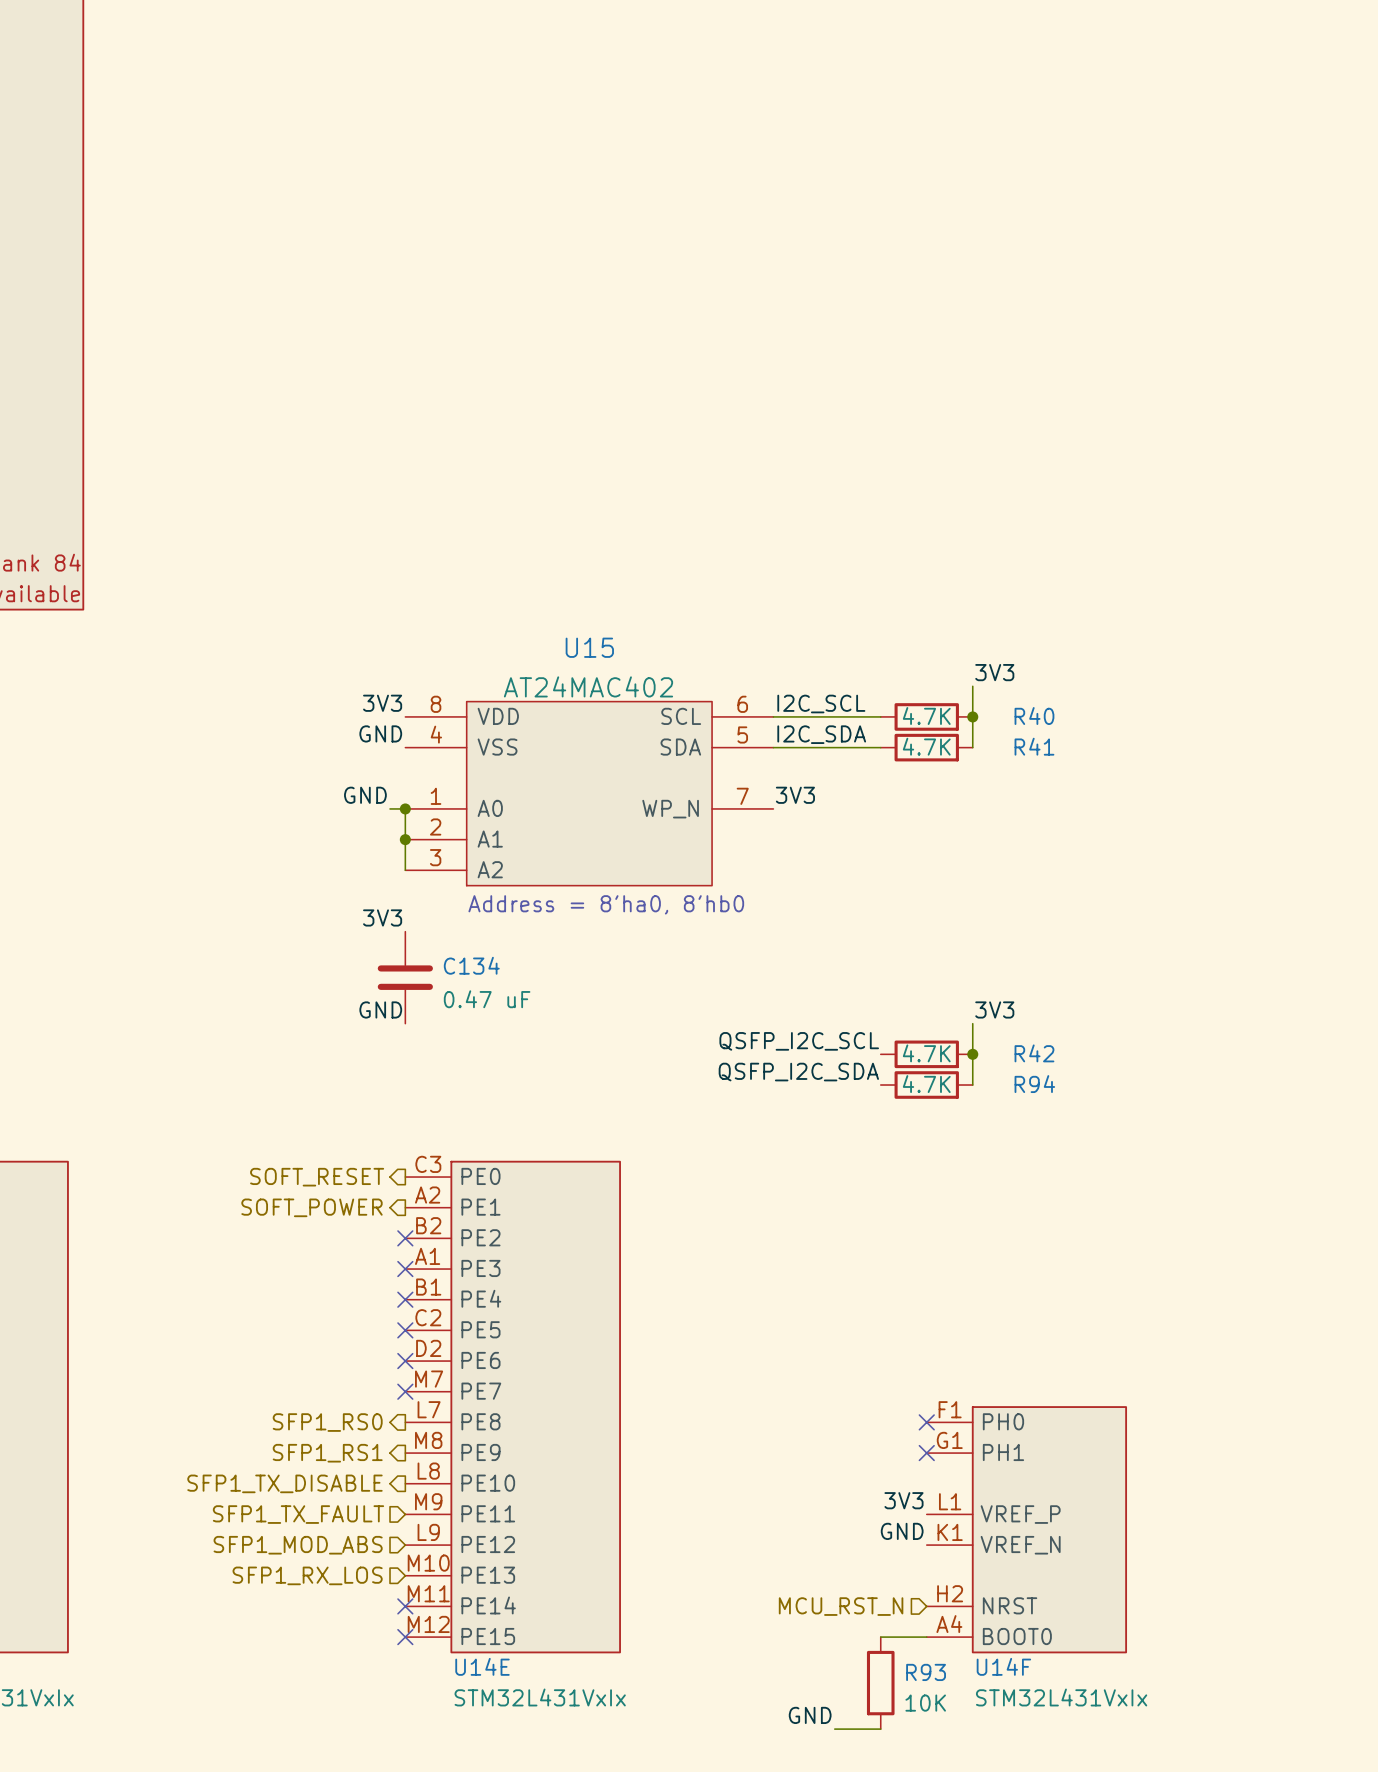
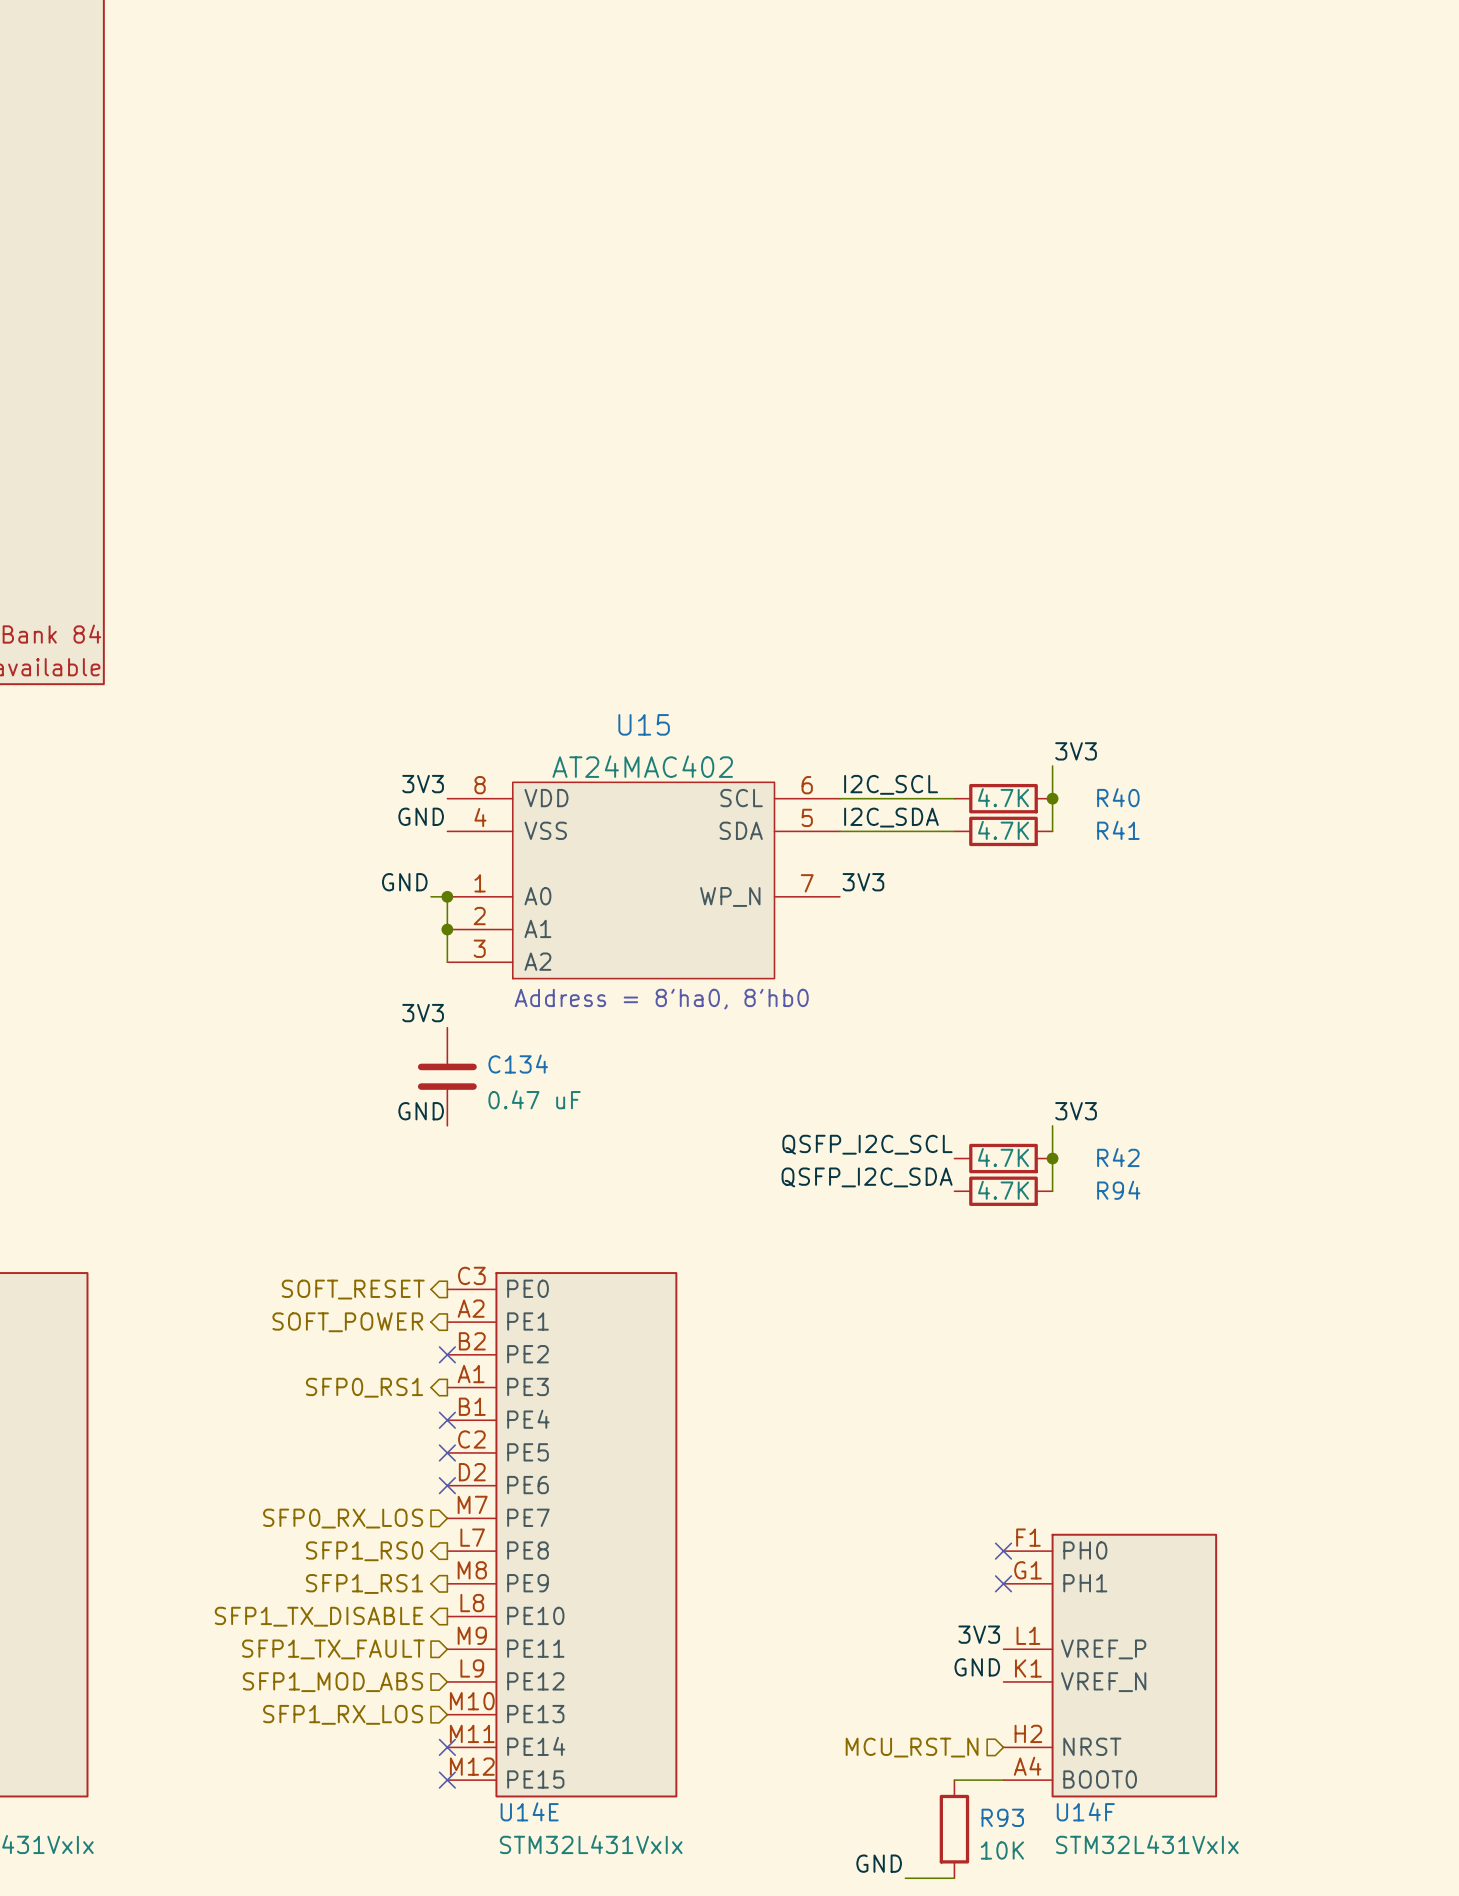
hierarchical label: none -> SFP0_RS1 (364, 1387)
no-connect mark: (405, 1269) -> none
hierarchical label: none -> SFP0_RX_LOS (343, 1518)
no-connect mark: (405, 1391) -> none

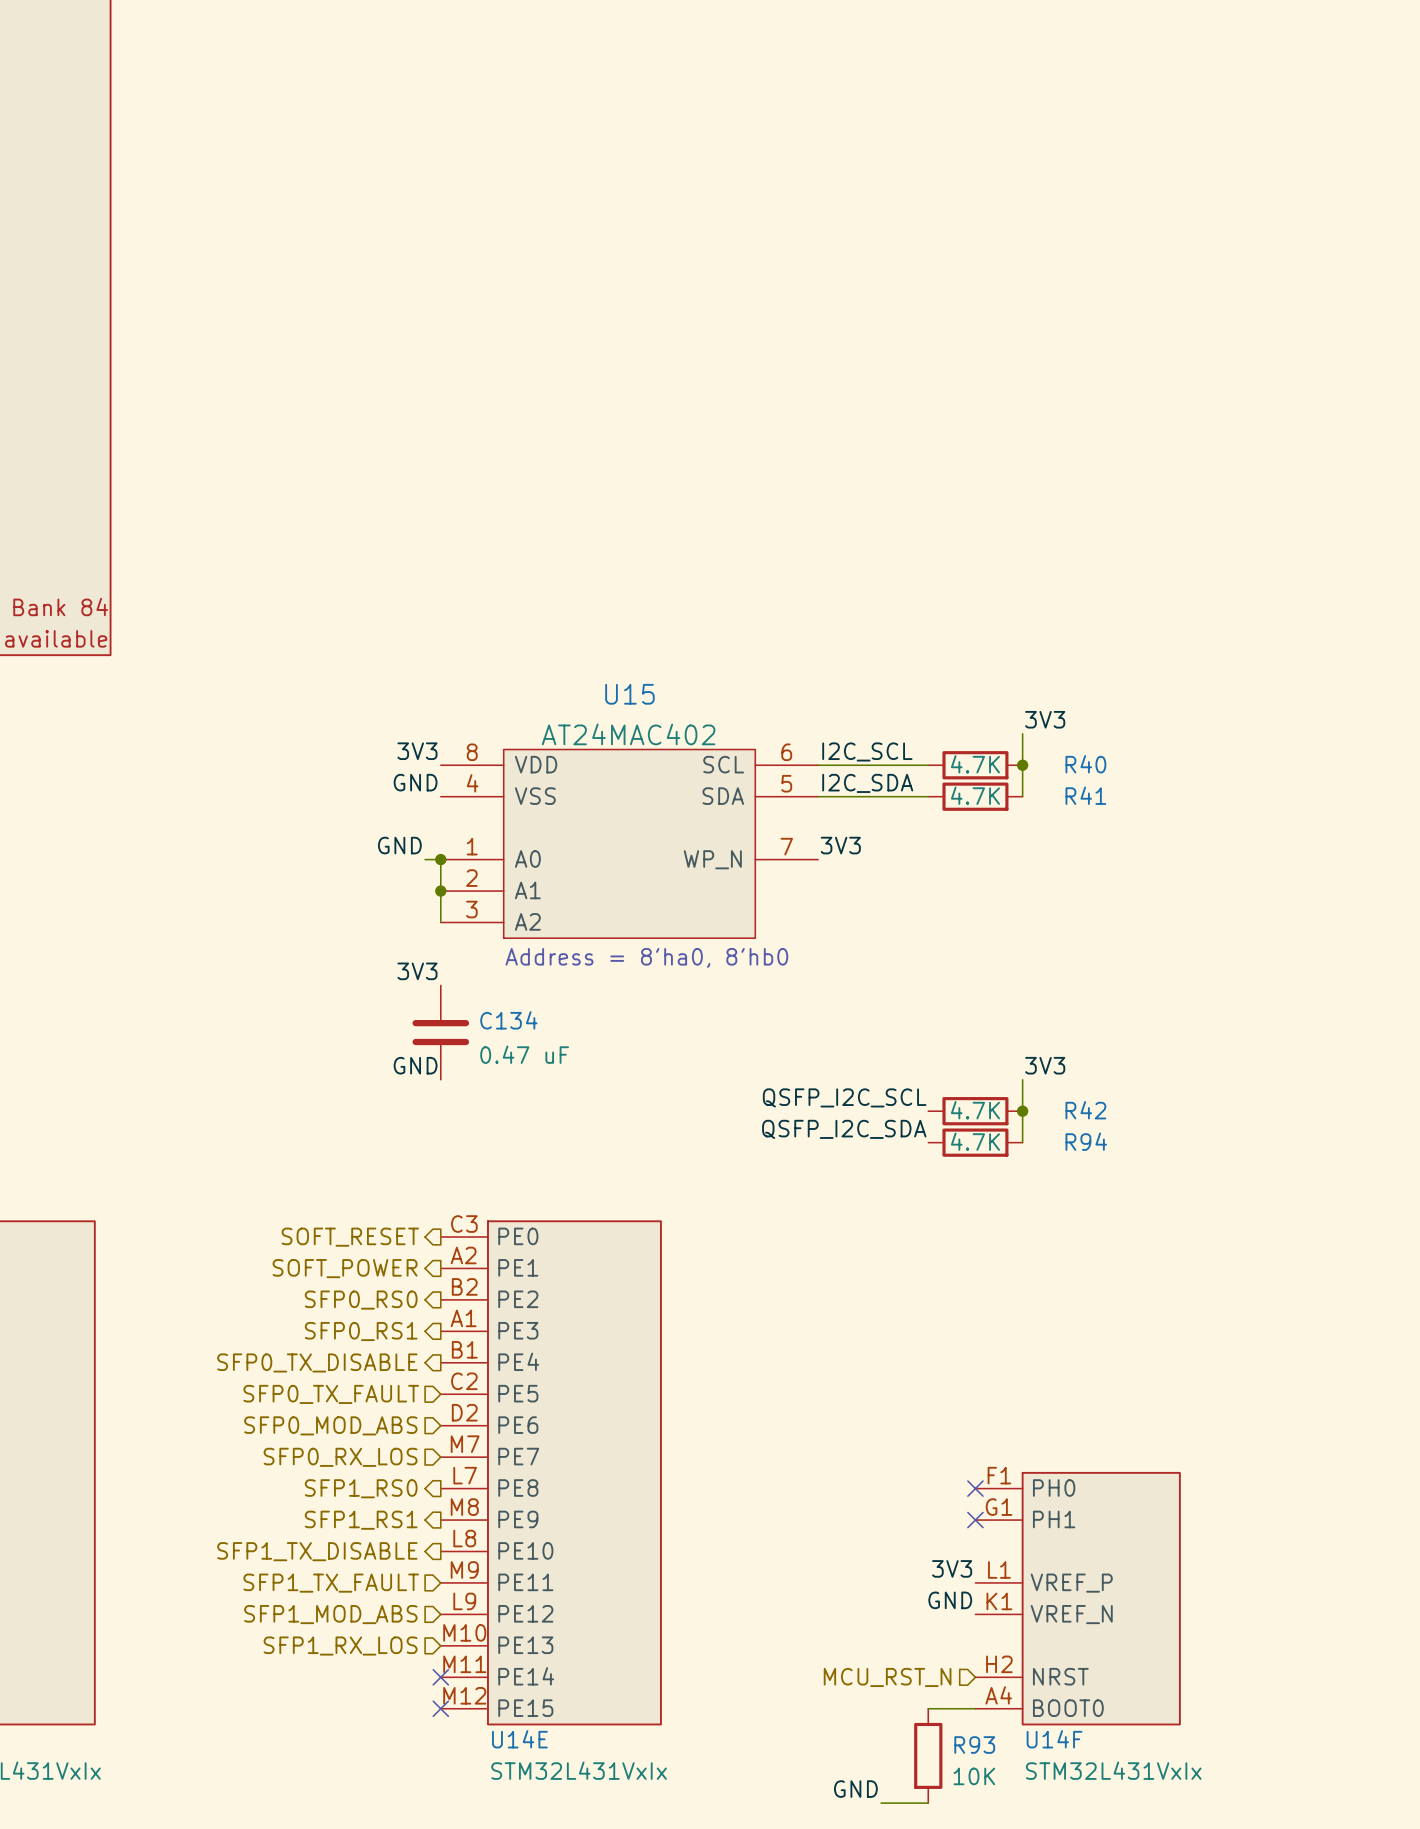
hierarchical label: none -> SFP0_RS0 (361, 1300)
no-connect mark: (447, 1354) -> none
hierarchical label: none -> SFP0_TX_DISABLE (317, 1362)
no-connect mark: (447, 1420) -> none
no-connect mark: (447, 1452) -> none
hierarchical label: none -> SFP0_TX_FAULT (331, 1394)
hierarchical label: none -> SFP0_MOD_ABS (330, 1425)
no-connect mark: (447, 1485) -> none

